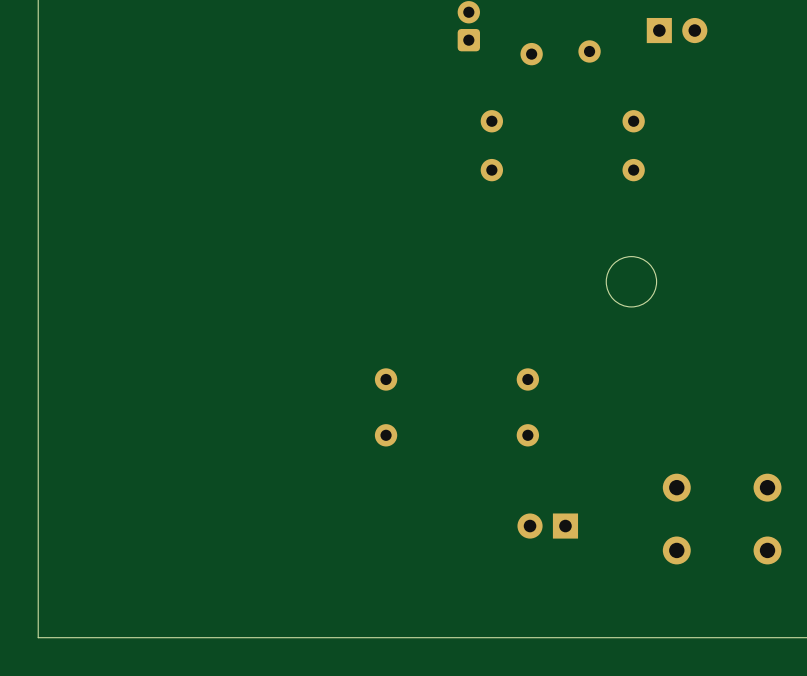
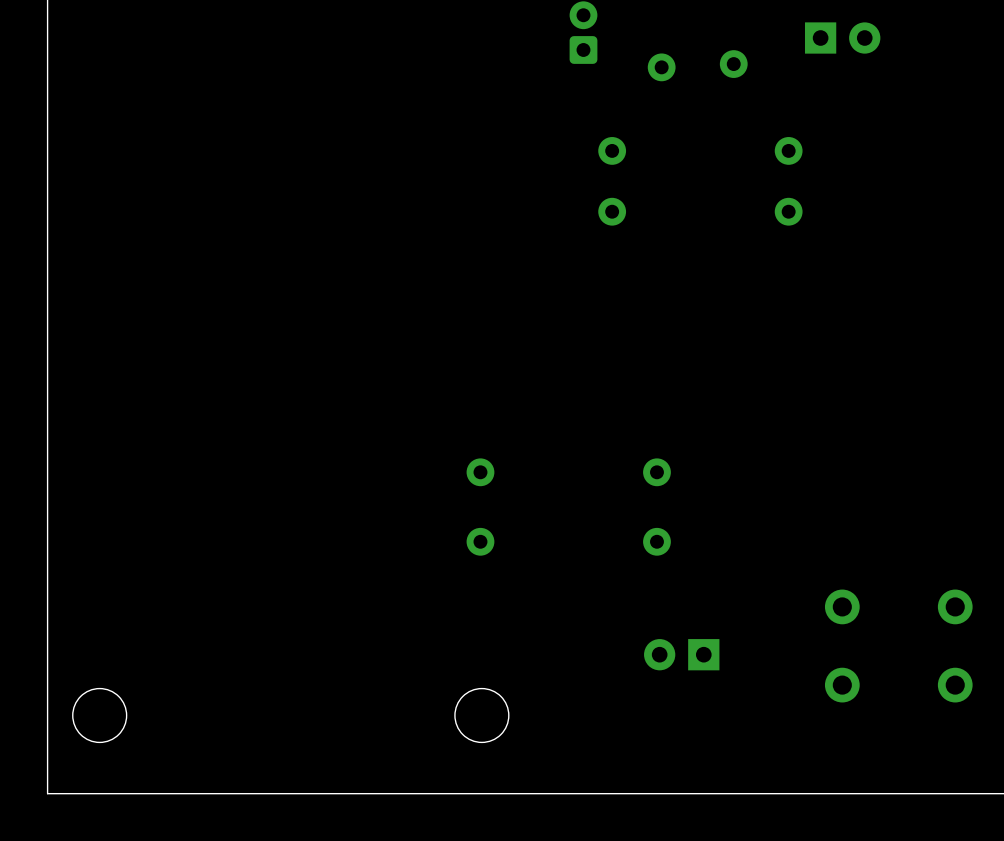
round board edge: [605, 256, 657, 308] -> none
round board edge: none -> [72, 688, 128, 743]
round board edge: none -> [454, 688, 510, 743]

